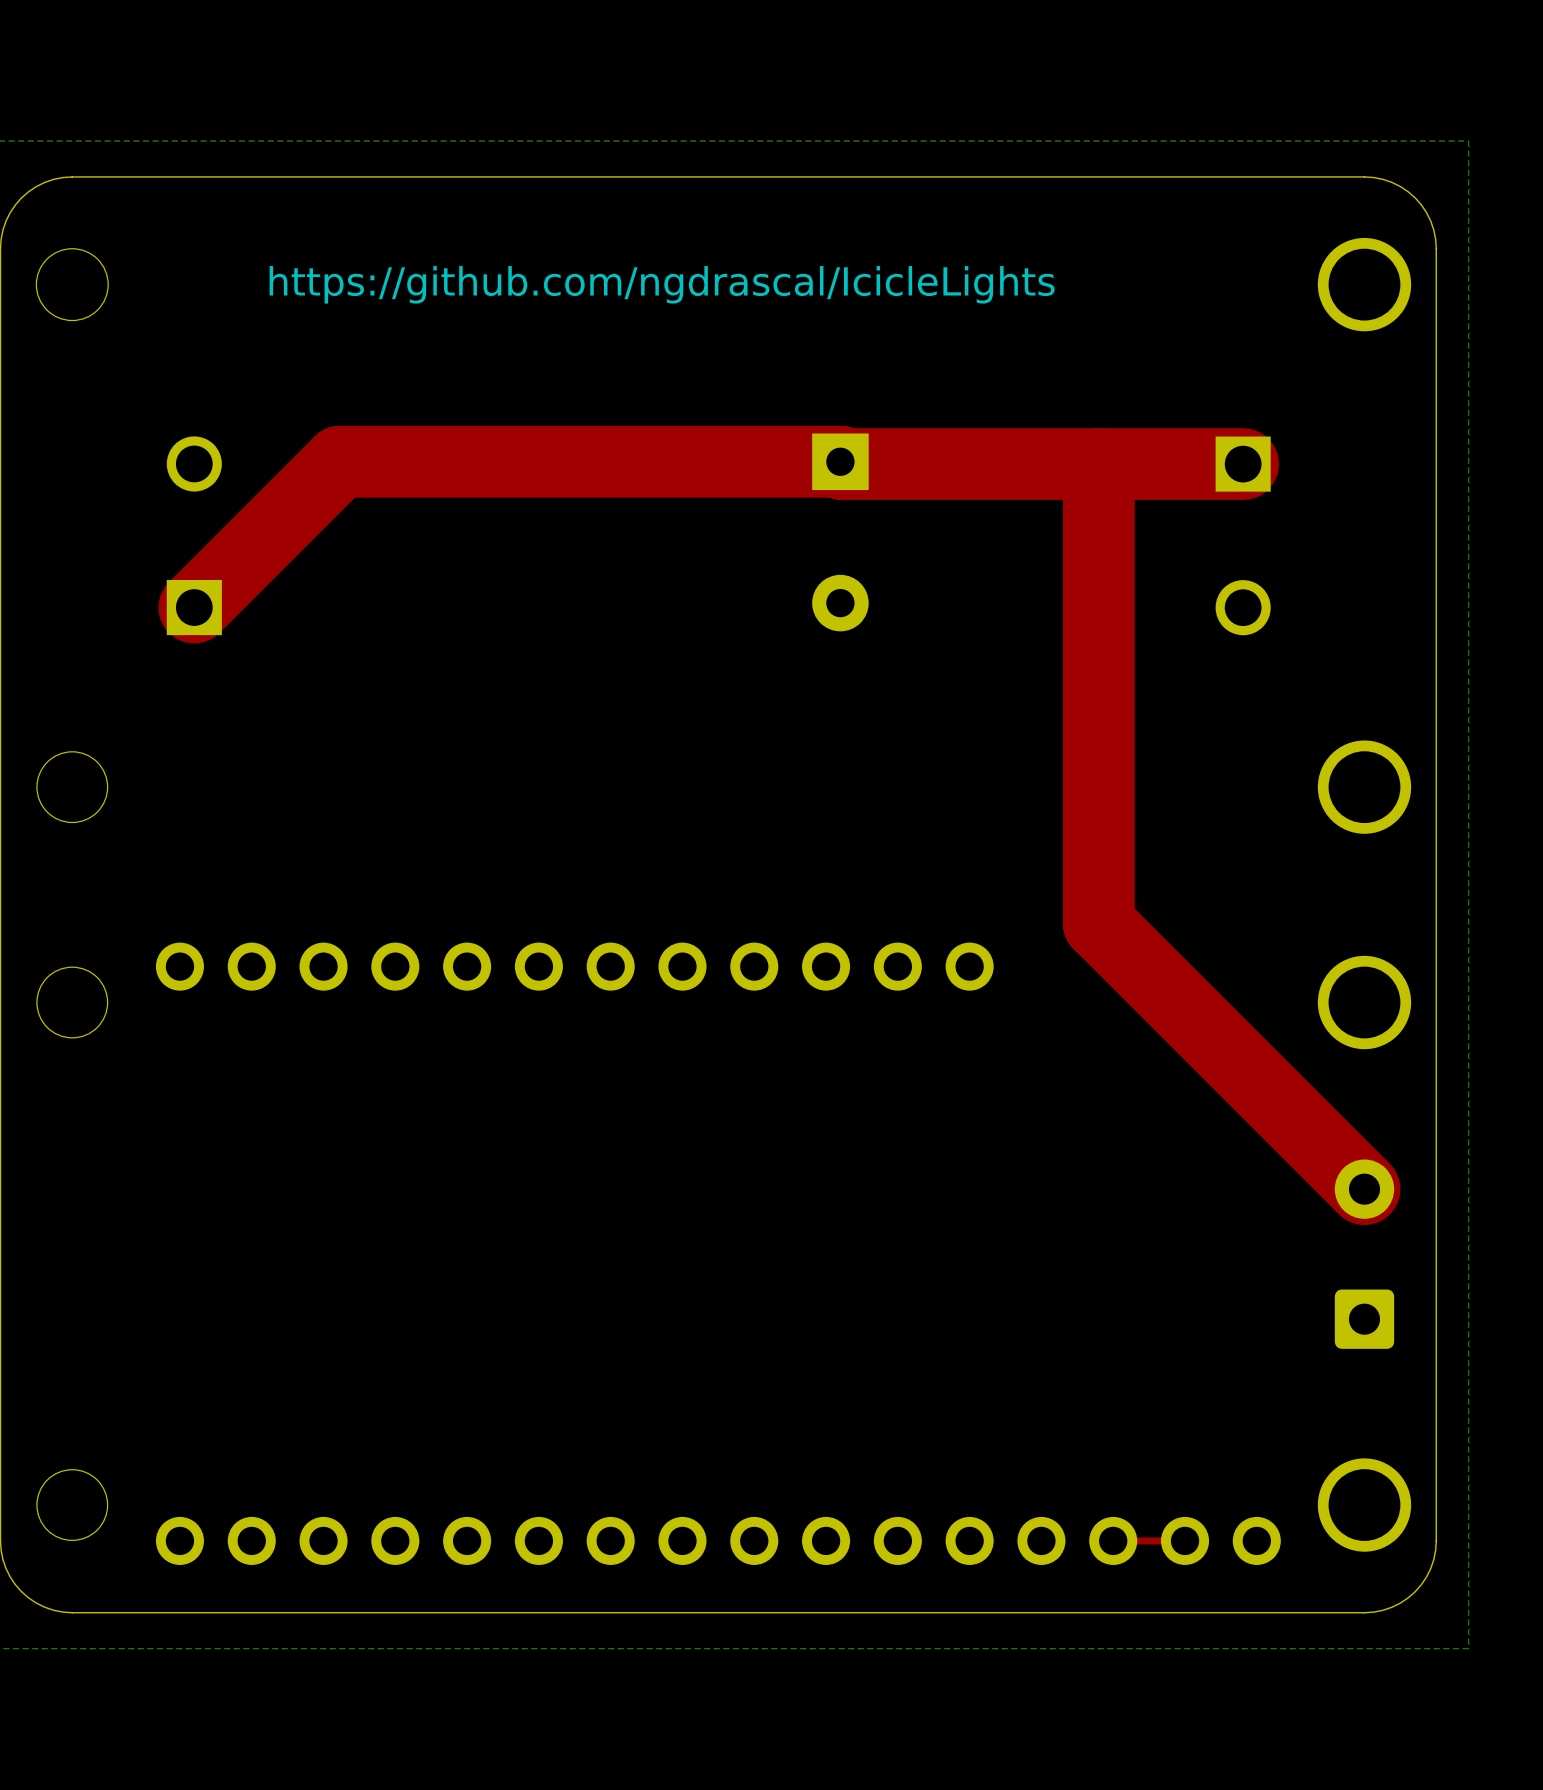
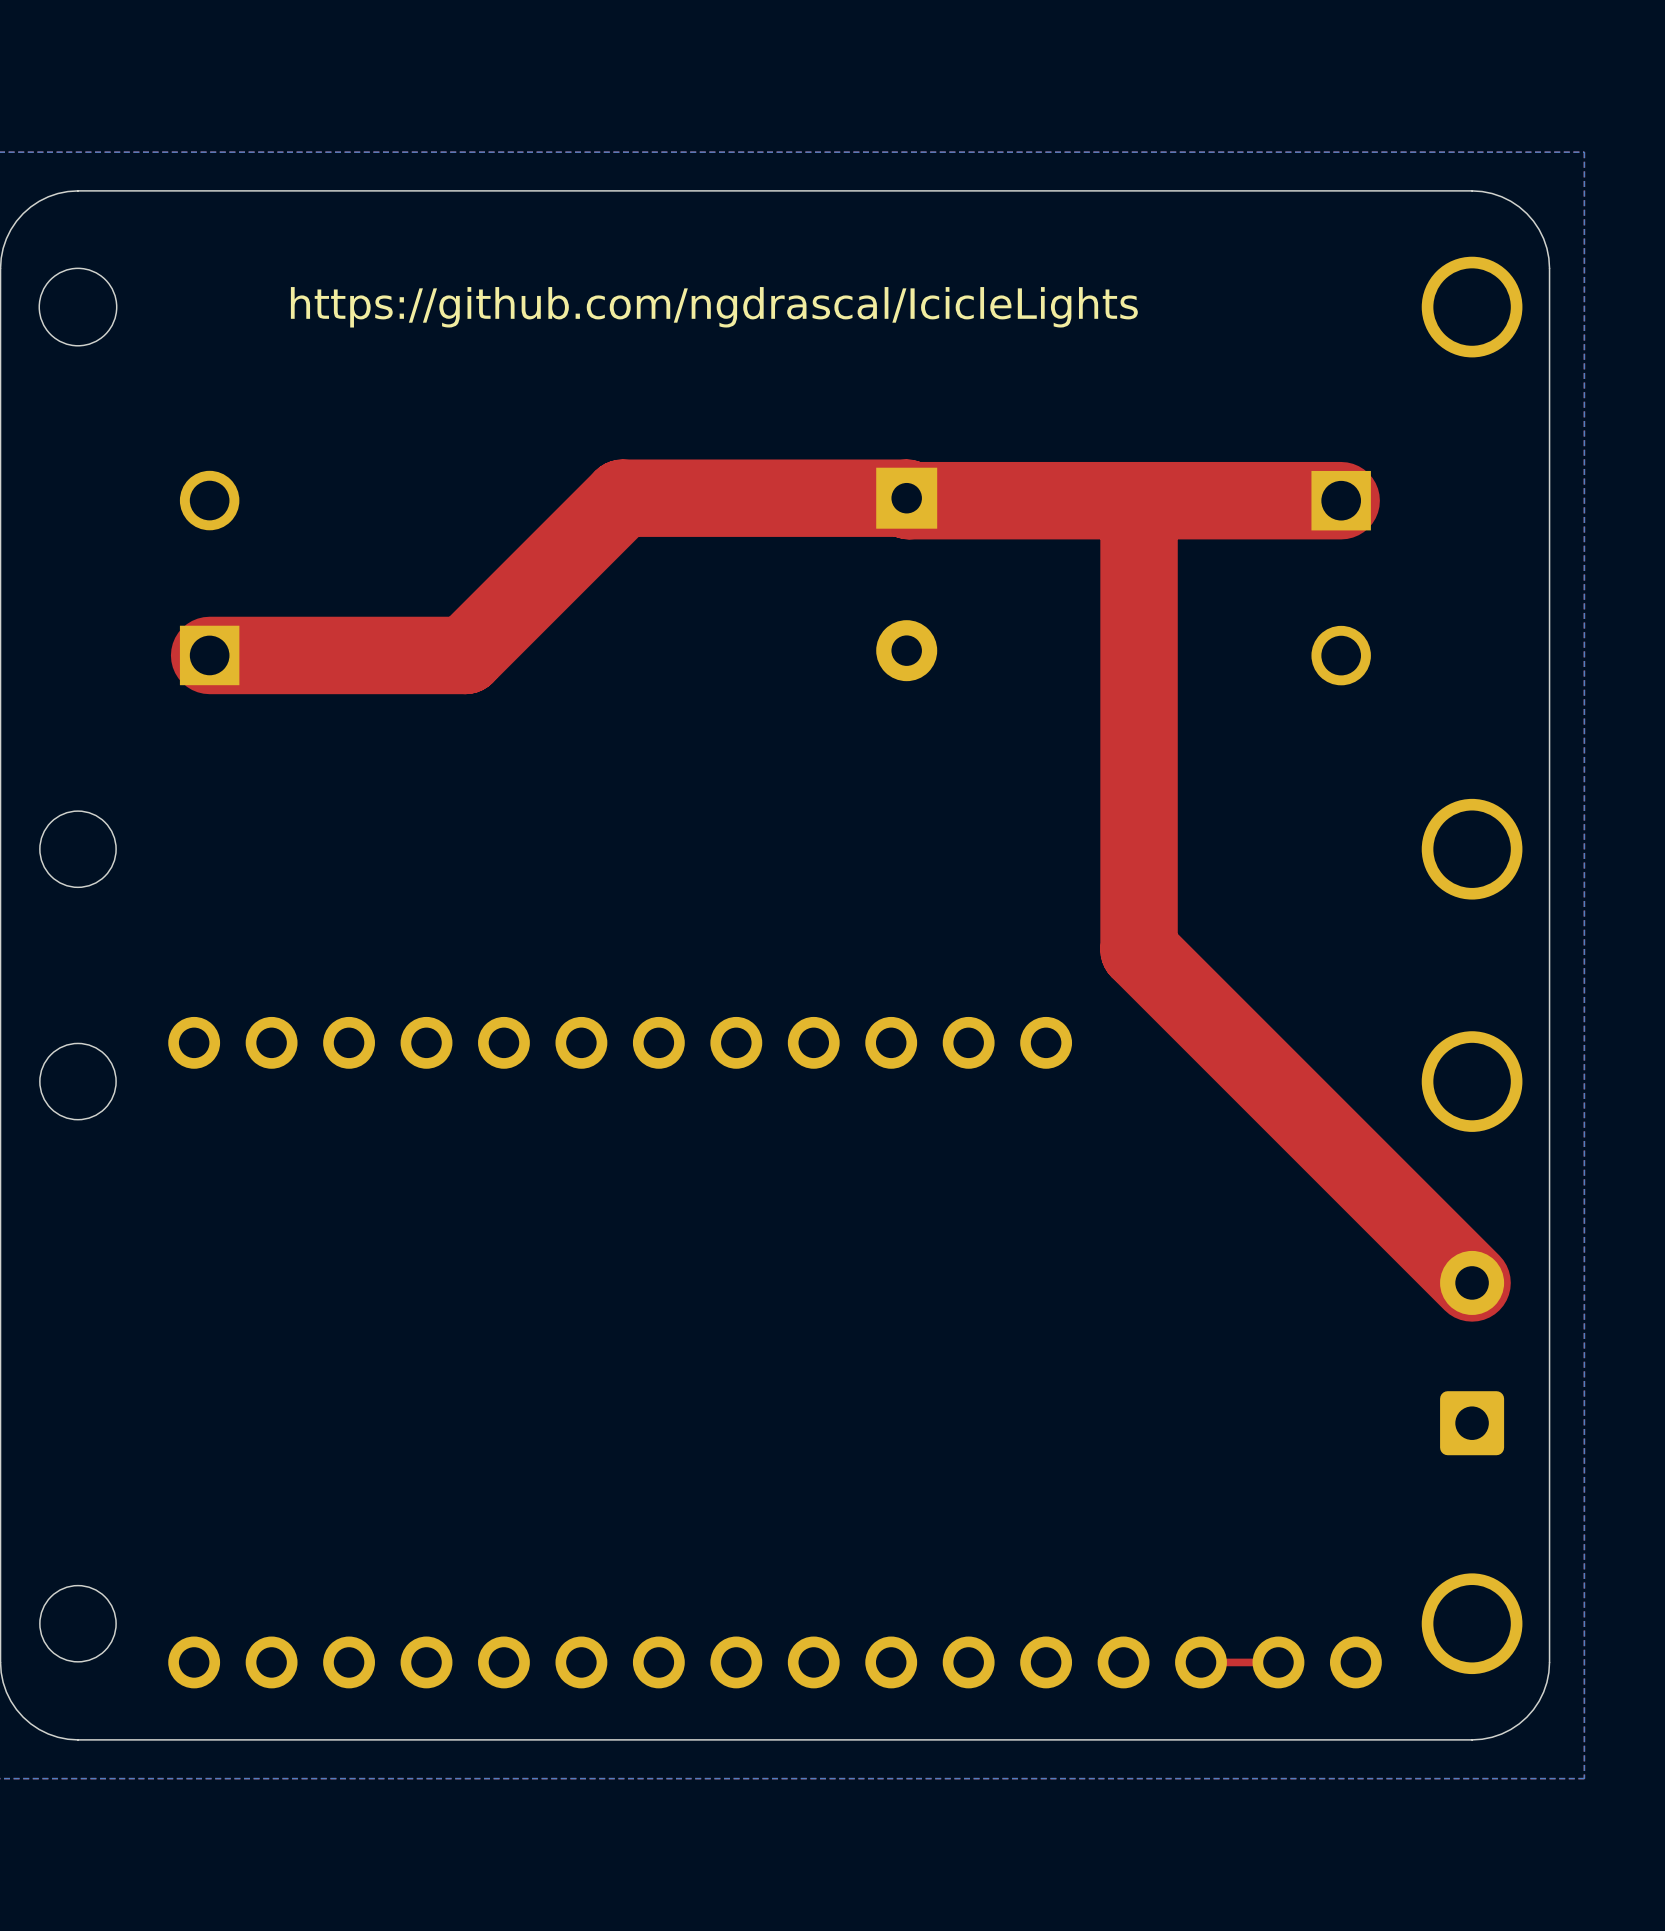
top track: (577, 461) (340, 461) (194, 607) -> (622, 498) (465, 655) (209, 655)
top track: (1098, 464) (1098, 923) -> (1139, 500) (1139, 949) (1185, 996)

